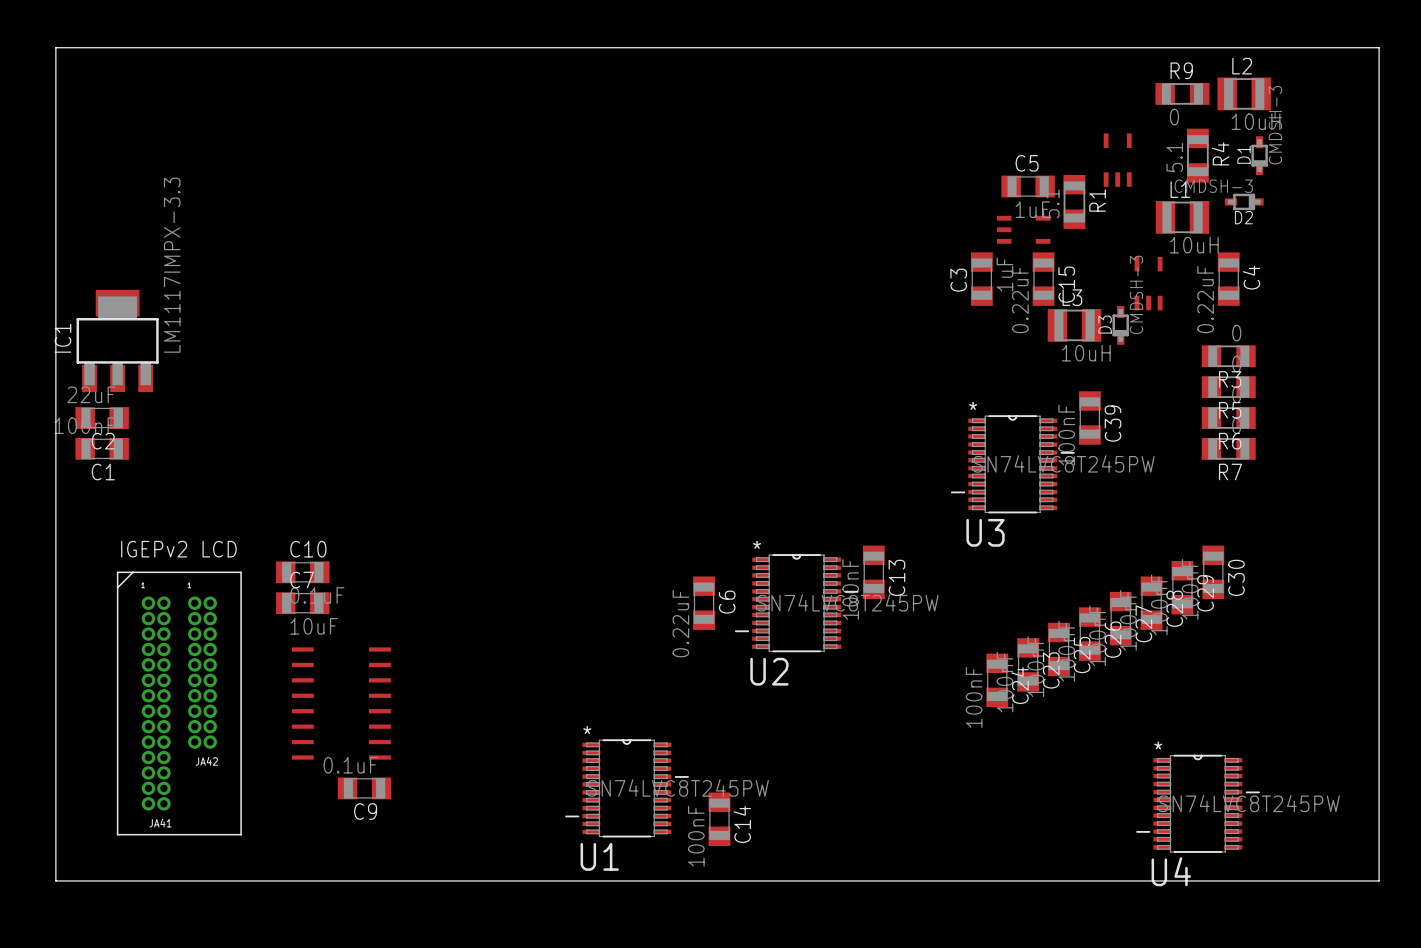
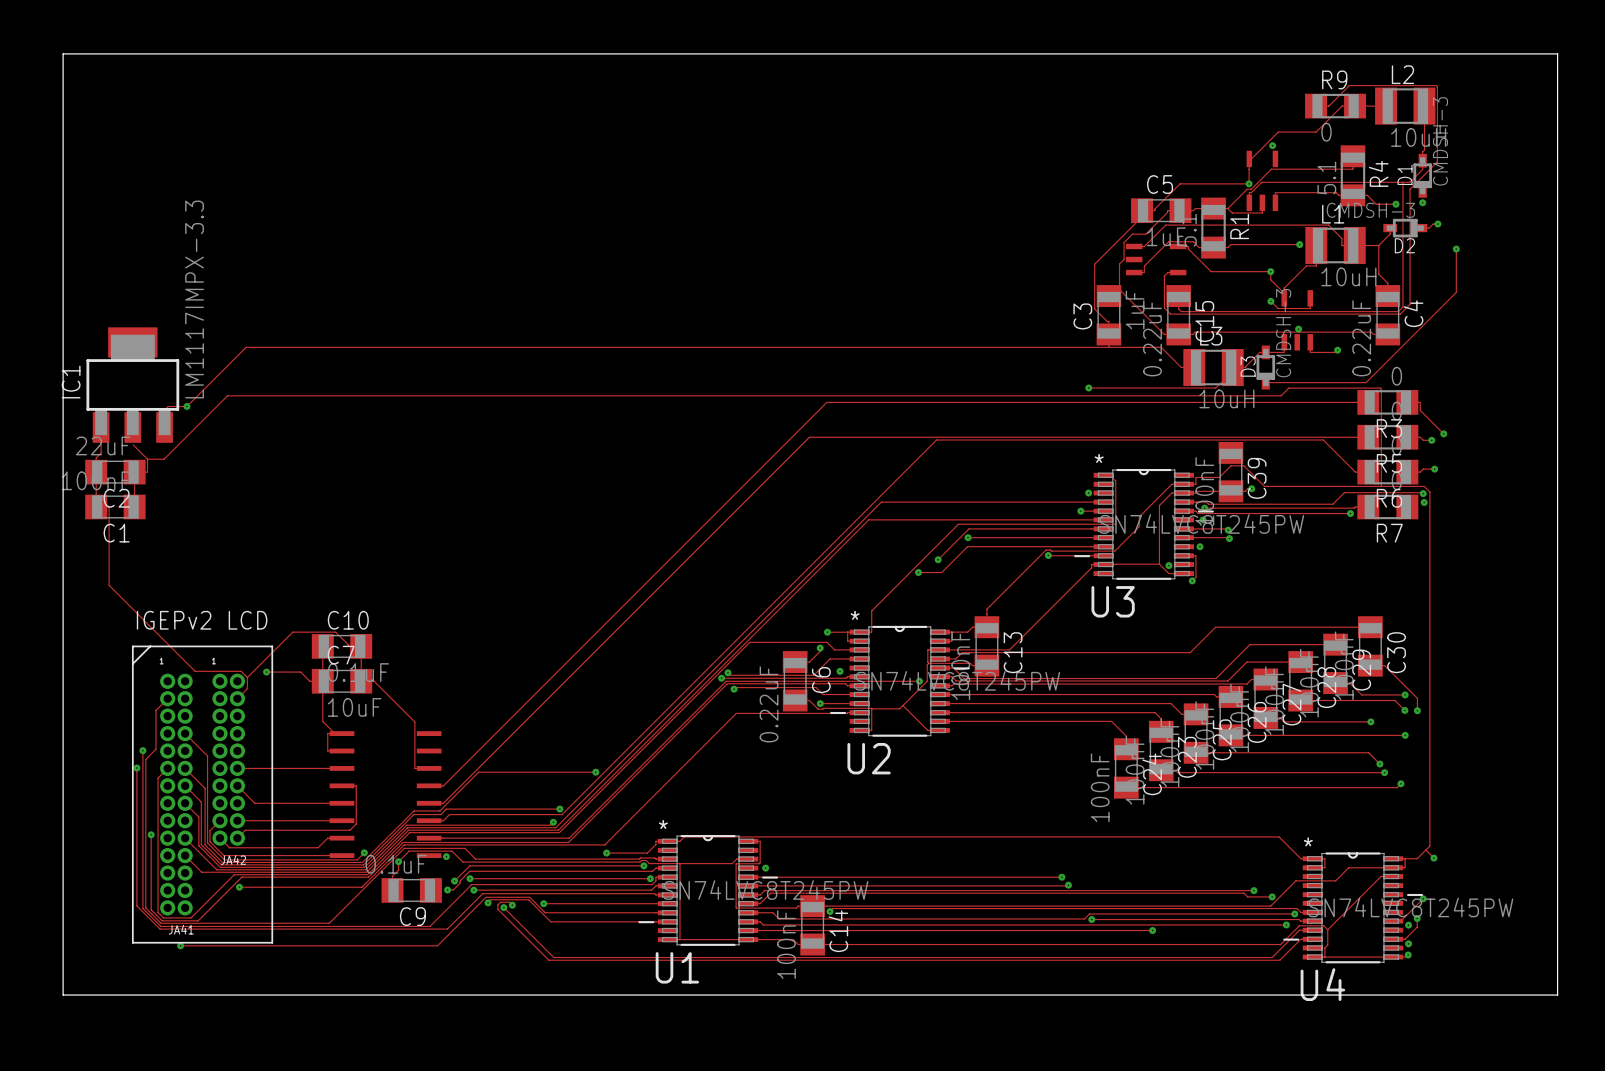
track: none -> (1316, 106) (1328, 106) (1349, 85) (1437, 86) (1437, 161) (1410, 189) (1410, 304) (1400, 314) (1170, 314) (1164, 307) (1164, 276) (1167, 272) (1178, 272)
track: none -> (1386, 106) (1342, 106) (1316, 132) (1278, 132) (1249, 160)
track: none -> (1424, 106) (1422, 169) (1409, 182) (1261, 182) (1249, 192) (1249, 202)
via: none -> (1272, 145)
track: none -> (1352, 156) (1352, 169) (1271, 169) (1227, 208)
track: none -> (1249, 158) (1249, 183) (1180, 183) (1154, 210) (1142, 210)
track: none -> (1402, 182) (1402, 306) (1398, 311) (1181, 311) (1178, 308) (1178, 296)
via: none -> (1249, 183)
track: none -> (1262, 202) (1262, 212) (1232, 212) (1227, 208)
track: none -> (1275, 202) (1275, 192) (1336, 192) (1338, 195) (1367, 195) (1376, 204) (1395, 204)
via: none -> (1422, 202)
via: none -> (1395, 204)
track: none -> (1227, 208) (1167, 210) (1145, 234) (1132, 234) (1124, 242) (1124, 259) (1119, 264) (1119, 289)
track: none -> (1148, 210) (1094, 264) (1094, 308) (1108, 321) (1108, 347)
track: none -> (1437, 224) (1433, 224) (1429, 228) (1420, 228)
via: none -> (1437, 224)
track: none -> (1390, 228) (1390, 234) (1378, 245)
track: none -> (1299, 244) (1230, 244) (1227, 247) (1199, 247) (1193, 241) (1168, 241) (1144, 266) (1144, 272) (1134, 272)
via: none -> (1299, 244)
track: none -> (1316, 245) (1316, 265) (1306, 265) (1284, 288) (1284, 298)
track: none -> (1378, 245) (1341, 245) (1341, 238) (1328, 225) (1165, 225) (1144, 246) (1134, 246)
track: none -> (1378, 245) (1378, 274) (1387, 283) (1387, 296)
track: none -> (1178, 246) (1188, 246) (1188, 248) (1211, 271) (1270, 271) (1270, 279) (1284, 293)
track: none -> (1456, 249) (1456, 292) (1366, 382) (1265, 382)
via: none -> (1456, 249)
via: none -> (1270, 271)
track: none -> (1119, 289) (1164, 334) (1192, 334) (1195, 332) (1371, 332) (1373, 334) (1387, 334)
track: none -> (1310, 298) (1310, 308) (1278, 308) (1270, 301)
via: none -> (1270, 301)
via: none -> (1298, 329)
track: none -> (1284, 342) (1284, 352) (1259, 352) (1245, 367) (1232, 367)
track: none -> (1310, 342) (1310, 352) (1335, 352) (1337, 350)
via: none -> (1337, 350)
track: none -> (1194, 367) (1181, 367) (1161, 347) (246, 347) (186, 406) (168, 406) (164, 410) (164, 427)
track: none -> (1236, 367) (1215, 387) (1088, 387)
via: none -> (1088, 387)
track: none -> (1368, 402) (826, 402) (443, 785) (429, 785)
track: none -> (1407, 402) (1420, 402) (1420, 410) (1443, 433)
via: none -> (186, 406)
track: none -> (101, 427) (101, 452) (96, 457) (96, 506) (109, 506) (109, 585) (195, 671) (241, 671) (247, 677)
via: none -> (1443, 433)
track: none -> (1368, 437) (809, 437) (443, 803) (429, 803)
track: none -> (1407, 437) (1420, 437) (1423, 440) (1431, 440)
via: none -> (1431, 440)
track: none -> (133, 444) (147, 459)
track: none -> (147, 459) (164, 459) (227, 395) (1281, 395) (1288, 388) (1380, 388) (1381, 486)
track: none -> (147, 459) (147, 472) (134, 472) (134, 506)
track: none -> (1434, 469) (1407, 472)
via: none -> (1434, 469)
track: none -> (1368, 472) (1355, 472) (1323, 440) (936, 440) (562, 814) (449, 814) (443, 820) (429, 820)
track: none -> (1103, 475) (1109, 475) (1115, 481) (1115, 524) (958, 524) (871, 610) (871, 632) (827, 632)
track: none -> (1251, 488) (1245, 491) (1171, 493) (1159, 505) (1159, 564)
via: none -> (1251, 488)
via: none -> (1088, 493)
track: none -> (1423, 493) (1344, 492) (1332, 504) (1208, 504) (1206, 502) (1183, 502)
via: none -> (1423, 493)
track: none -> (1103, 502) (881, 502) (555, 827) (407, 827) (365, 869) (216, 869) (185, 838)
via: none -> (1424, 502)
track: none -> (1368, 506) (1204, 508)
via: none -> (1204, 508)
track: none -> (1080, 511) (1103, 511)
via: none -> (1080, 511)
track: none -> (1183, 511) (1195, 511) (1198, 513) (1350, 513)
via: none -> (1350, 513)
track: none -> (1103, 519) (868, 519) (558, 830) (408, 830) (366, 872) (201, 872) (185, 855)
via: none -> (1203, 519)
track: none -> (1103, 528) (968, 528) (938, 559)
track: none -> (1183, 528) (1228, 530)
via: none -> (1228, 530)
track: none -> (968, 537) (1103, 537)
via: none -> (968, 537)
track: none -> (1183, 537) (1229, 538)
via: none -> (1229, 538)
track: none -> (1103, 546) (967, 546) (941, 572) (918, 572)
via: none -> (1199, 546)
track: none -> (1048, 555) (1103, 555)
via: none -> (1048, 555)
track: none -> (1183, 555) (1195, 555) (1195, 577) (1192, 580)
via: none -> (938, 559)
track: none -> (1159, 564) (1091, 564) (1091, 567) (1009, 649) (927, 649) (928, 663)
track: none -> (1159, 564) (1168, 573) (1183, 573)
via: none -> (1168, 565)
via: none -> (918, 572)
via: none -> (1192, 580)
track: none -> (1370, 627) (1215, 627) (1190, 652) (962, 652) (955, 658) (939, 658)
via: none -> (827, 632)
track: none -> (847, 632) (847, 641) (859, 641)
track: none -> (939, 632) (967, 632) (972, 627) (986, 627) (986, 609) (1046, 550) (1114, 551) (1139, 526) (1139, 516) (1171, 484) (1195, 484) (1195, 477) (1219, 477) (1230, 465) (1243, 465) (1264, 486) (1424, 486) (1429, 492) (1429, 846) (1417, 858) (1393, 858)
track: none -> (951, 632) (951, 641) (939, 641)
track: none -> (1335, 644) (1249, 644) (1216, 678) (964, 678) (953, 668) (939, 668)
track: none -> (322, 646) (322, 721) (334, 733)
track: none -> (820, 648) (820, 651) (809, 662) (795, 662)
via: none -> (820, 648)
track: none -> (859, 649) (834, 649) (827, 642) (749, 642) (559, 832) (409, 832) (367, 874) (234, 874) (191, 917) (163, 917) (158, 912) (158, 778) (167, 768)
track: none -> (859, 658) (830, 658) (813, 675) (730, 675) (727, 672)
track: none -> (1300, 662) (1246, 662) (1227, 680) (956, 680) (951, 676) (939, 676)
track: none -> (928, 663) (927, 665) (927, 681) (899, 708) (871, 708)
track: none -> (928, 663) (970, 663) (972, 665) (986, 665)
track: none -> (1370, 665) (1384, 665) (1417, 698) (1417, 710)
via: none -> (840, 671)
track: none -> (266, 672) (300, 672) (309, 681) (322, 681)
via: none -> (266, 672)
via: none -> (727, 672)
track: none -> (247, 677) (292, 632) (335, 632) (348, 646) (361, 646) (361, 681) (374, 681) (414, 722) (414, 768) (429, 768)
track: none -> (247, 677) (247, 688) (237, 698)
track: none -> (859, 676) (721, 678)
via: none -> (721, 678)
track: none -> (1265, 679) (1251, 679) (1247, 684) (953, 684) (951, 685) (939, 685)
track: none -> (919, 681) (726, 681) (569, 838) (429, 838)
via: none -> (919, 681)
track: none -> (1335, 683) (1349, 683) (1361, 694) (1405, 694)
track: none -> (859, 685) (847, 685) (845, 683) (727, 683) (568, 842) (403, 842) (368, 877) (241, 877) (198, 920) (162, 920) (151, 909) (151, 834)
track: none -> (734, 689) (735, 687) (816, 687) (823, 694) (859, 694)
via: none -> (734, 689)
track: none -> (939, 694) (1214, 694) (1216, 696) (1230, 696)
via: none -> (1405, 694)
track: none -> (167, 698) (155, 710) (155, 749) (145, 759) (145, 907) (161, 923) (329, 923) (404, 848) (464, 848) (475, 859) (667, 859)
track: none -> (795, 700) (809, 700) (818, 709) (871, 708)
track: none -> (1300, 700) (1394, 700) (1404, 710)
track: none -> (820, 703) (859, 703)
via: none -> (820, 703)
track: none -> (939, 703) (1171, 703) (1181, 714) (1196, 714)
track: none -> (902, 705) (927, 730) (939, 730)
track: none -> (871, 708) (871, 730) (859, 730)
via: none -> (1404, 710)
via: none -> (1417, 710)
track: none -> (859, 712) (736, 713) (604, 844) (404, 844) (361, 887) (239, 887)
track: none -> (939, 712) (1155, 712) (1161, 718) (1161, 731)
track: none -> (1265, 717) (1280, 717) (1284, 721) (1370, 721)
track: none -> (939, 721) (1111, 721) (1126, 736) (1126, 749)
via: none -> (1370, 721)
track: none -> (185, 733) (207, 756) (207, 843) (224, 859) (357, 859) (364, 852)
track: none -> (342, 733) (327, 733) (327, 751) (342, 751)
track: none -> (1230, 735) (1405, 735)
via: none -> (1405, 735)
track: none -> (142, 750) (142, 908) (160, 926) (429, 926) (471, 884) (652, 884) (655, 880) (655, 877) (667, 877)
via: none -> (142, 750)
track: none -> (1196, 752) (1368, 752) (1379, 764)
via: none -> (1379, 764)
track: none -> (136, 768) (136, 905) (160, 929) (447, 929) (482, 893) (667, 894)
via: none -> (136, 768)
track: none -> (185, 768) (205, 788) (205, 845) (222, 862) (362, 862) (414, 810) (439, 810) (478, 772) (595, 772)
track: none -> (237, 768) (342, 768)
track: none -> (1161, 770) (1175, 770) (1177, 772) (1384, 772)
via: none -> (595, 772)
via: none -> (1384, 772)
track: none -> (1400, 783) (1397, 787) (1126, 787)
via: none -> (1400, 783)
track: none -> (185, 785) (201, 802) (201, 844) (221, 864) (363, 864) (413, 814) (440, 814) (446, 809) (559, 809)
track: none -> (237, 785) (254, 803) (342, 803)
track: none -> (342, 785) (356, 785) (356, 823) (349, 830) (245, 830) (237, 838)
track: none -> (185, 803) (198, 817) (198, 845) (220, 867) (364, 867) (406, 825) (550, 825) (553, 822)
via: none -> (559, 809)
track: none -> (219, 820) (210, 830) (210, 841) (223, 855) (342, 855)
track: none -> (237, 820) (342, 820)
via: none -> (553, 822)
via: none -> (151, 834)
track: none -> (219, 838) (229, 847) (318, 847) (327, 838) (342, 838)
track: none -> (748, 841) (760, 841) (760, 862) (736, 864) (736, 908) (796, 908) (798, 906) (1270, 906) (1295, 880) (1335, 880) (1348, 867) (1404, 867) (1405, 858)
track: none -> (1425, 850) (1433, 858)
via: none -> (364, 852)
track: none -> (606, 853) (647, 853) (655, 844) (655, 841) (679, 841) (684, 836) (1279, 836) (1300, 858) (1324, 858) (1324, 867) (1312, 867)
via: none -> (606, 853)
via: none -> (446, 856)
via: none -> (1433, 858)
track: none -> (748, 859) (736, 859) (732, 863) (649, 863) (646, 860) (640, 862) (462, 862) (451, 851) (409, 851) (398, 861) (398, 870) (392, 876) (392, 890)
via: none -> (398, 861)
track: none -> (679, 863) (679, 939)
track: none -> (643, 865) (469, 865) (454, 881)
via: none -> (643, 865)
track: none -> (667, 868) (655, 868) (652, 871) (469, 871) (453, 890) (447, 890)
via: none -> (765, 868)
track: none -> (748, 877) (1061, 877)
via: none -> (1061, 877)
track: none -> (1393, 876) (1381, 876) (1327, 929)
track: none -> (470, 878) (650, 878)
via: none -> (470, 878)
via: none -> (650, 878)
via: none -> (454, 881)
track: none -> (1068, 885) (748, 885)
via: none -> (1068, 885)
track: none -> (667, 885) (655, 885) (651, 890) (473, 890)
via: none -> (239, 887)
via: none -> (447, 890)
via: none -> (473, 890)
track: none -> (1253, 890) (764, 890) (760, 894) (748, 894)
via: none -> (1253, 890)
track: none -> (1272, 896) (1247, 896) (1244, 893) (770, 893) (760, 903) (748, 903)
via: none -> (1272, 896)
track: none -> (1423, 898) (1400, 921) (1393, 921)
via: none -> (1423, 898)
track: none -> (488, 902) (491, 899) (528, 899) (550, 921) (667, 921)
via: none -> (488, 902)
track: none -> (543, 903) (667, 903)
via: none -> (543, 903)
track: none -> (512, 905) (509, 902) (500, 902) (497, 904) (497, 909) (548, 960) (1279, 960) (1300, 939) (1312, 939)
via: none -> (512, 905)
track: none -> (503, 907) (553, 957) (1272, 957) (1299, 930) (1312, 930)
via: none -> (503, 907)
track: none -> (830, 911) (833, 908) (1296, 908) (1300, 912) (1312, 912)
via: none -> (830, 911)
track: none -> (667, 912) (545, 912) (529, 897) (486, 897) (437, 945) (180, 945)
track: none -> (748, 912) (772, 912) (779, 918) (1084, 918) (1089, 913) (1294, 913)
via: none -> (1294, 913)
track: none -> (1417, 918) (1417, 927) (1405, 939) (1393, 939)
via: none -> (1417, 918)
track: none -> (1091, 919) (1312, 921)
via: none -> (1091, 919)
track: none -> (748, 921) (760, 921) (763, 924) (1286, 924)
via: none -> (1286, 924)
via: none -> (1408, 925)
track: none -> (748, 930) (1152, 930)
via: none -> (1152, 930)
track: none -> (1327, 929) (1323, 925) (1299, 925) (1280, 944) (798, 944) (793, 939) (667, 939)
track: none -> (1327, 929) (1327, 945) (1324, 947) (1324, 957)
via: none -> (1408, 943)
via: none -> (180, 945)
track: none -> (1408, 955) (1406, 957) (1312, 957)
via: none -> (1408, 955)

